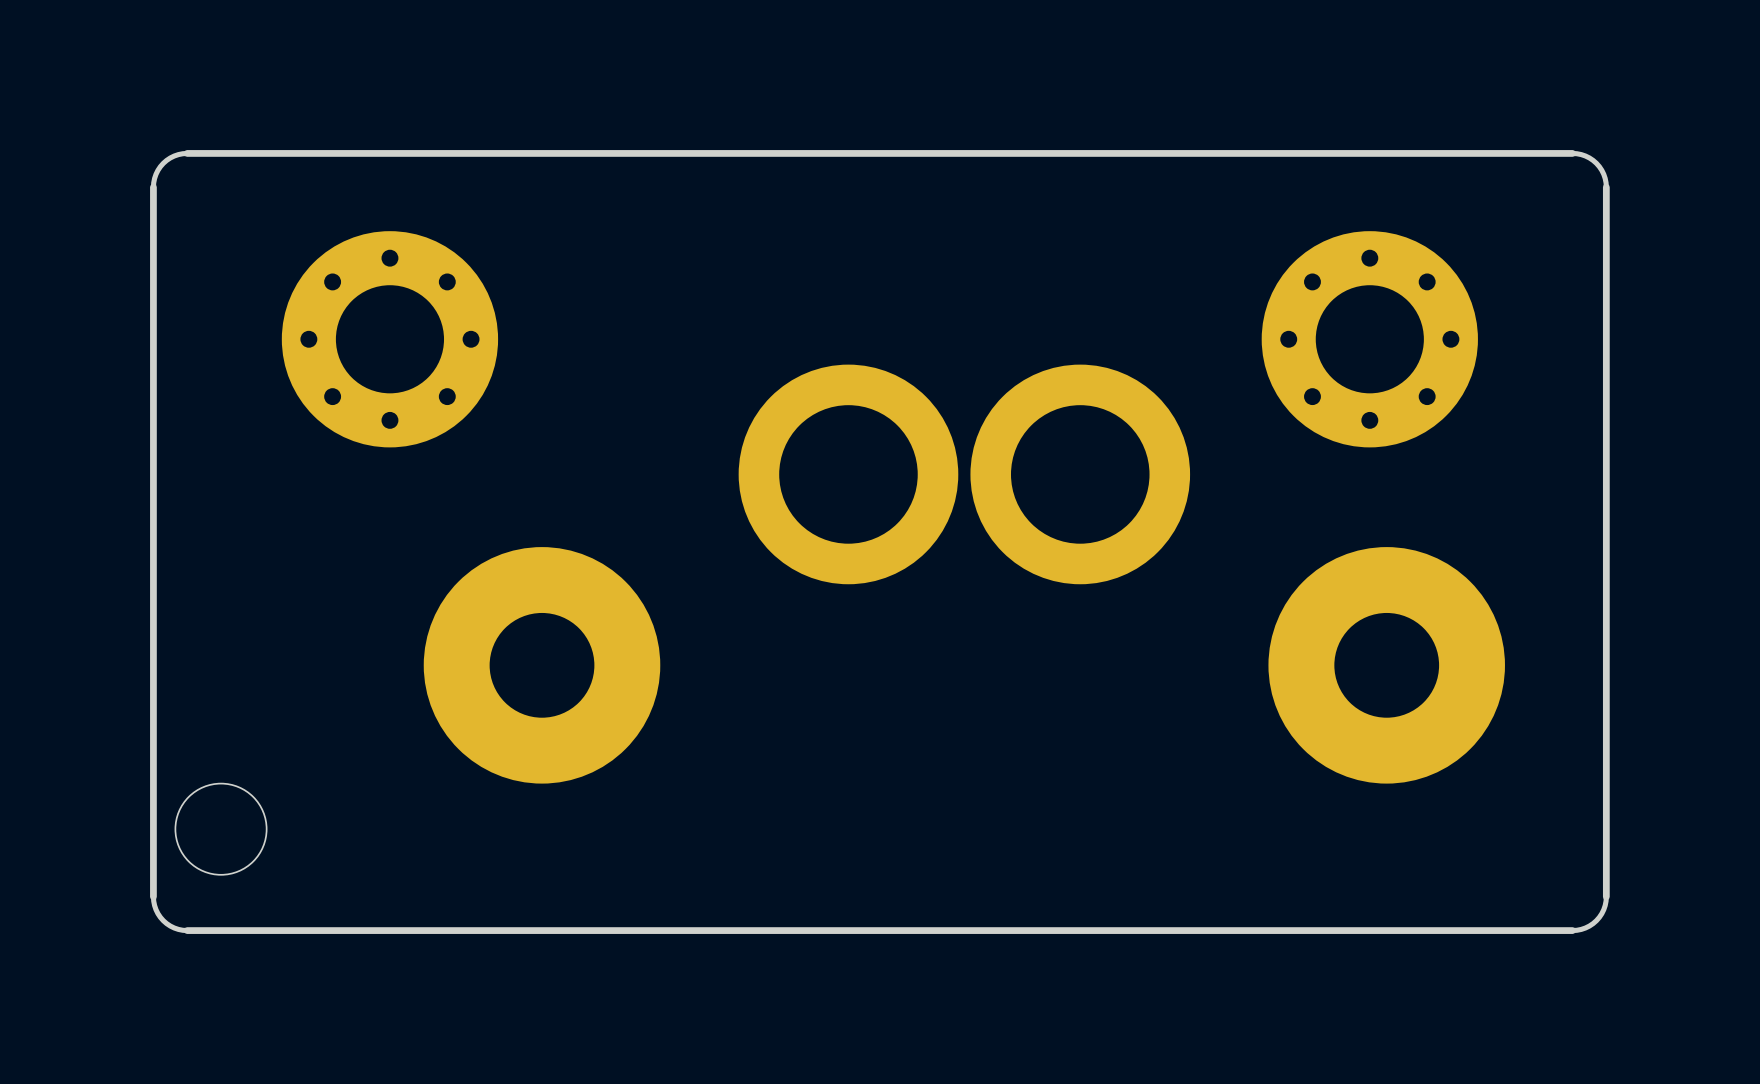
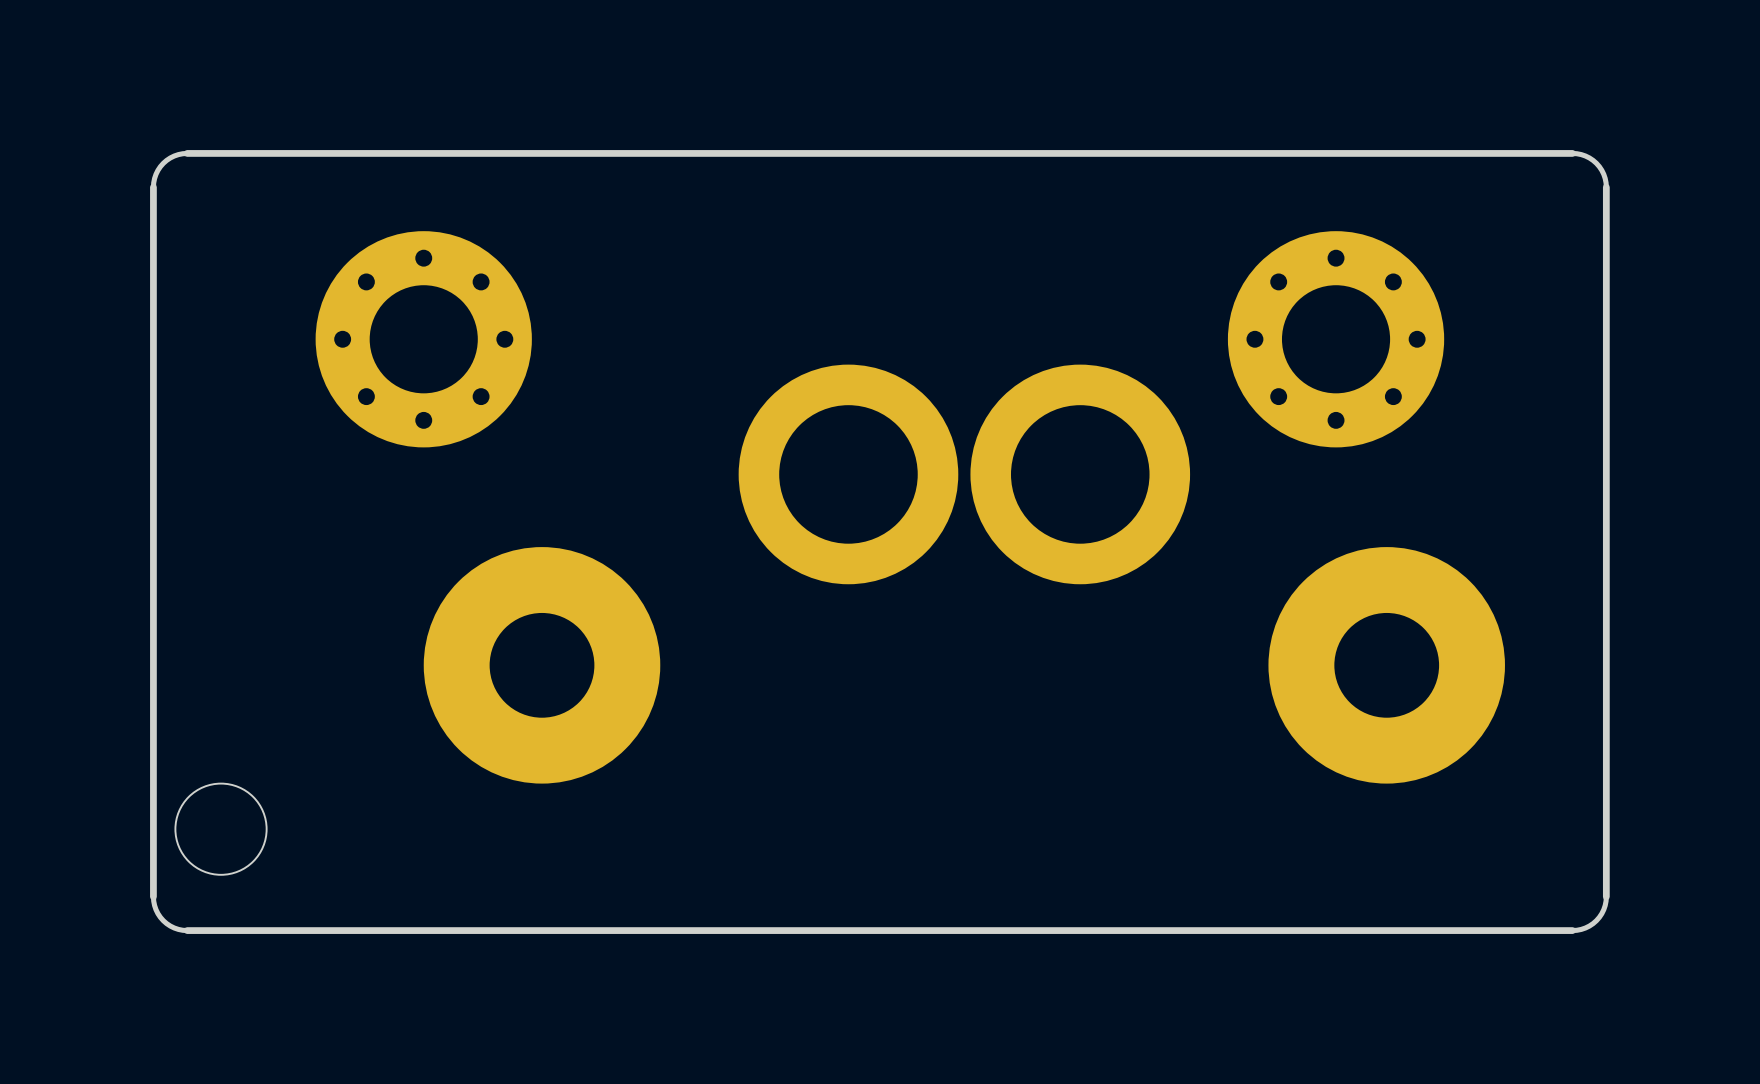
part position: (389, 339) -> (423, 339)
part position: (1369, 339) -> (1336, 339)

